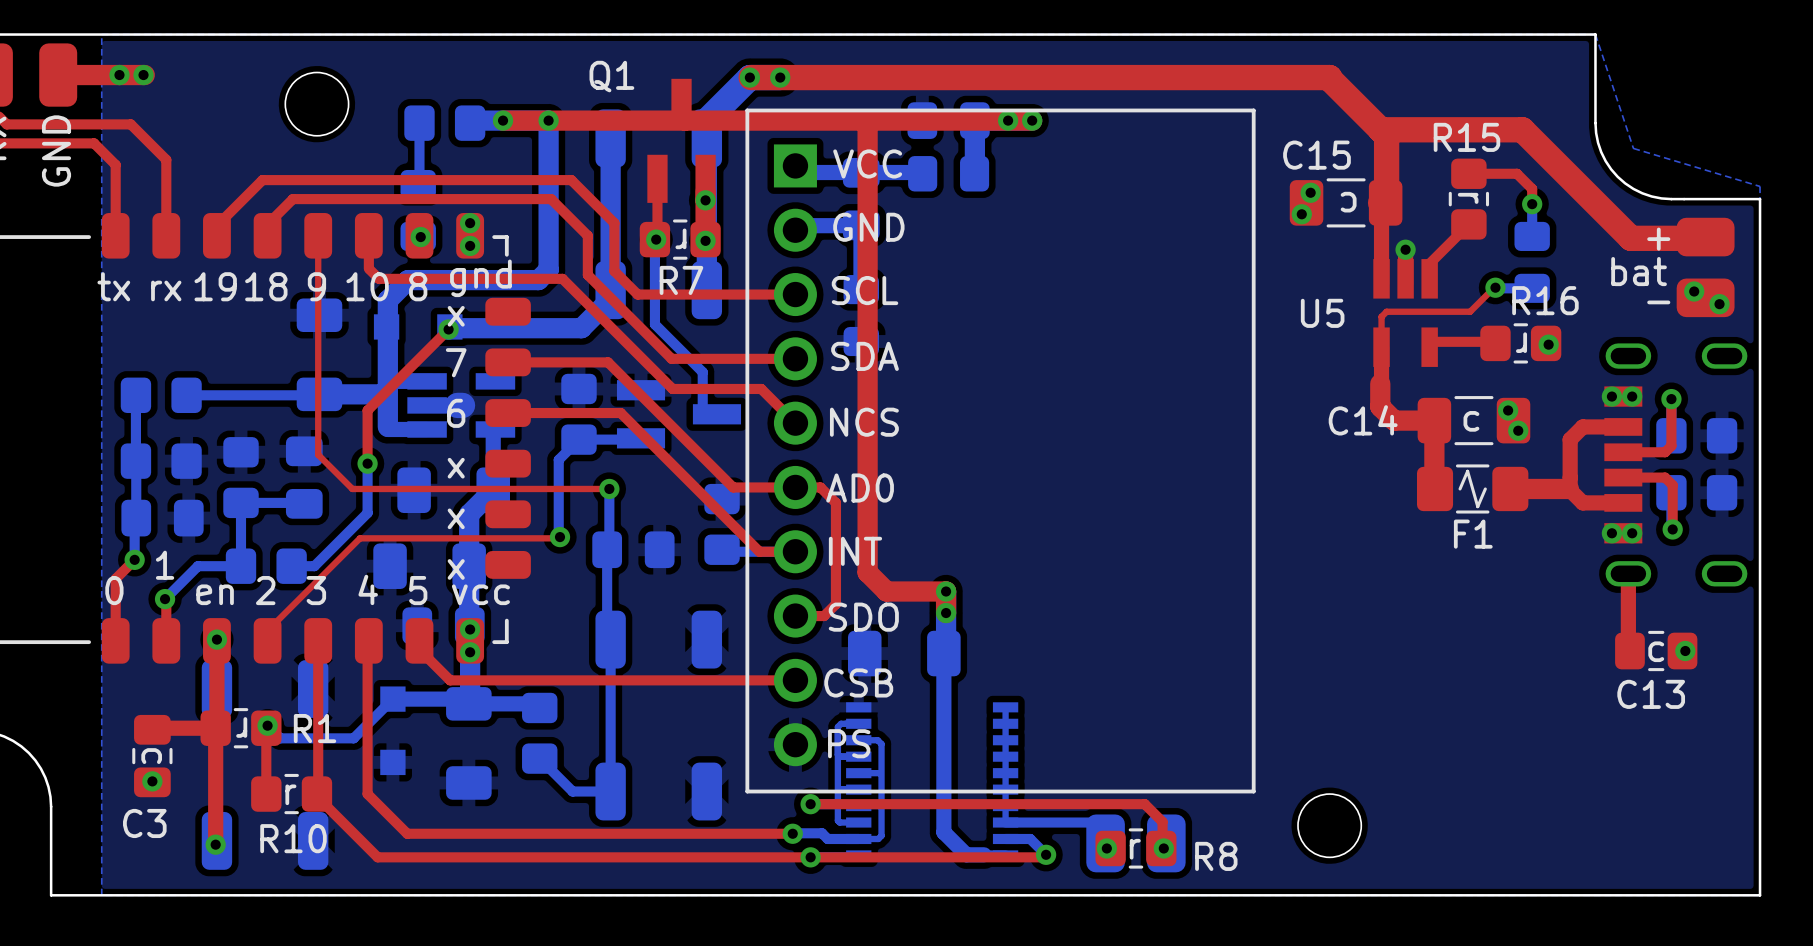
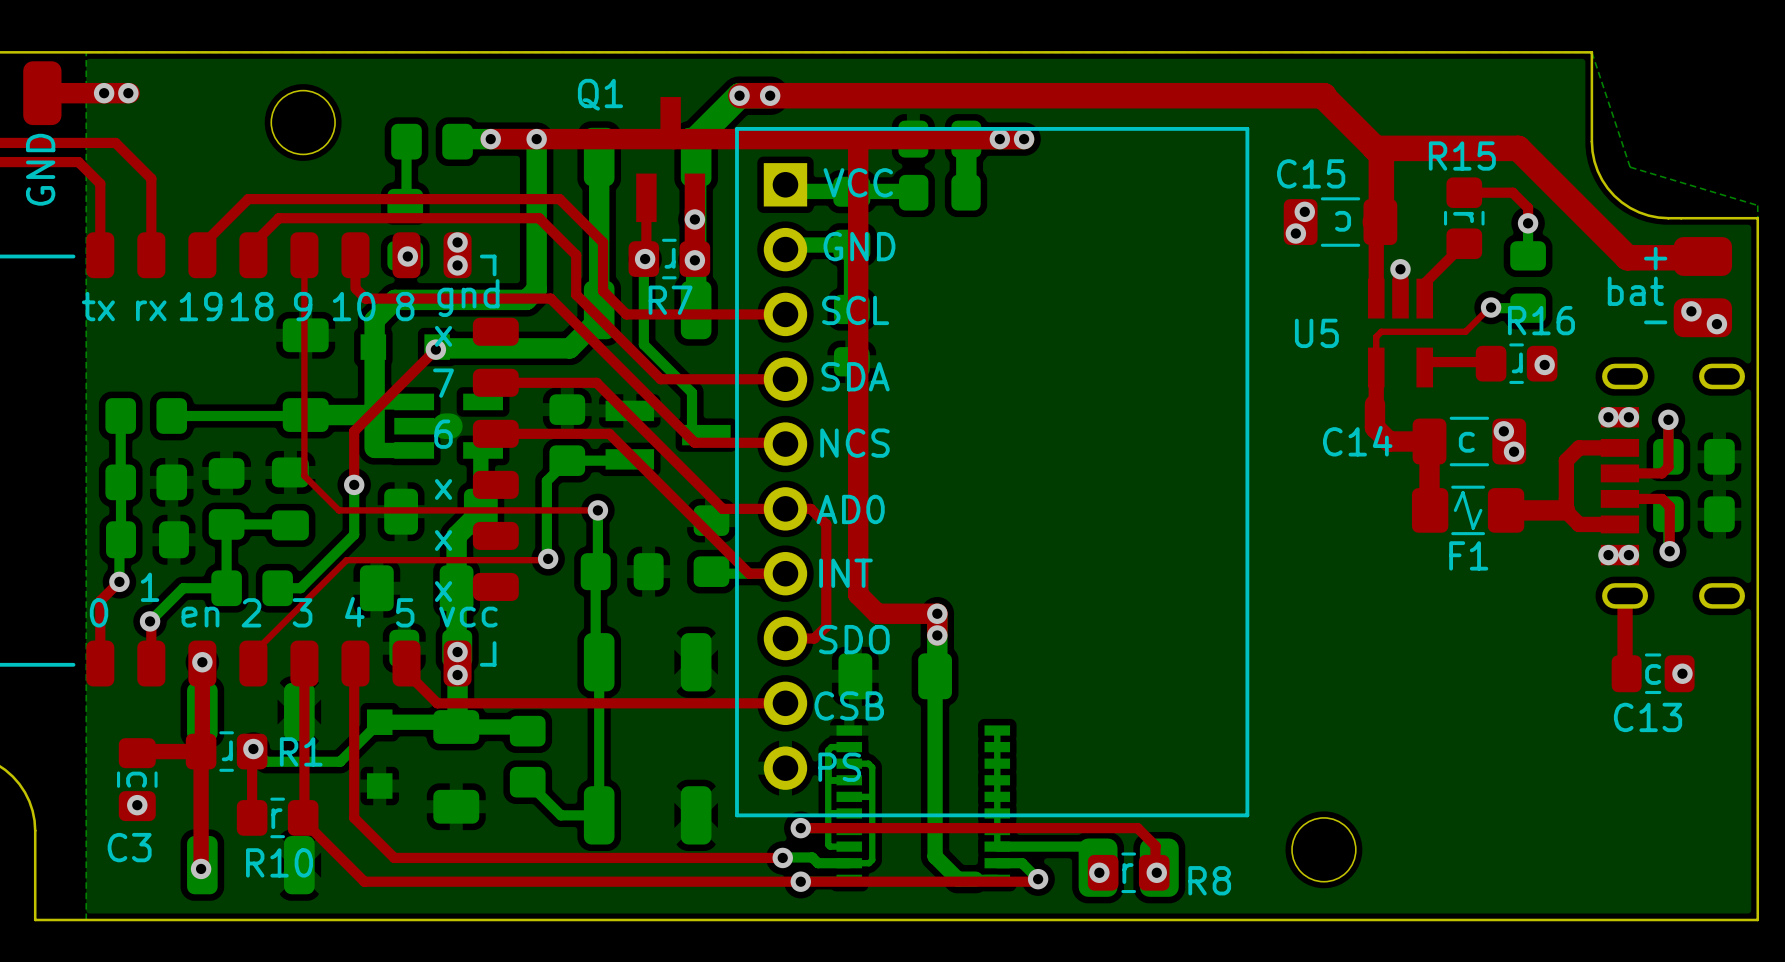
top track: (672, 388) (761, 388) (794, 421) -> (661, 409) (694, 442) (784, 442)

